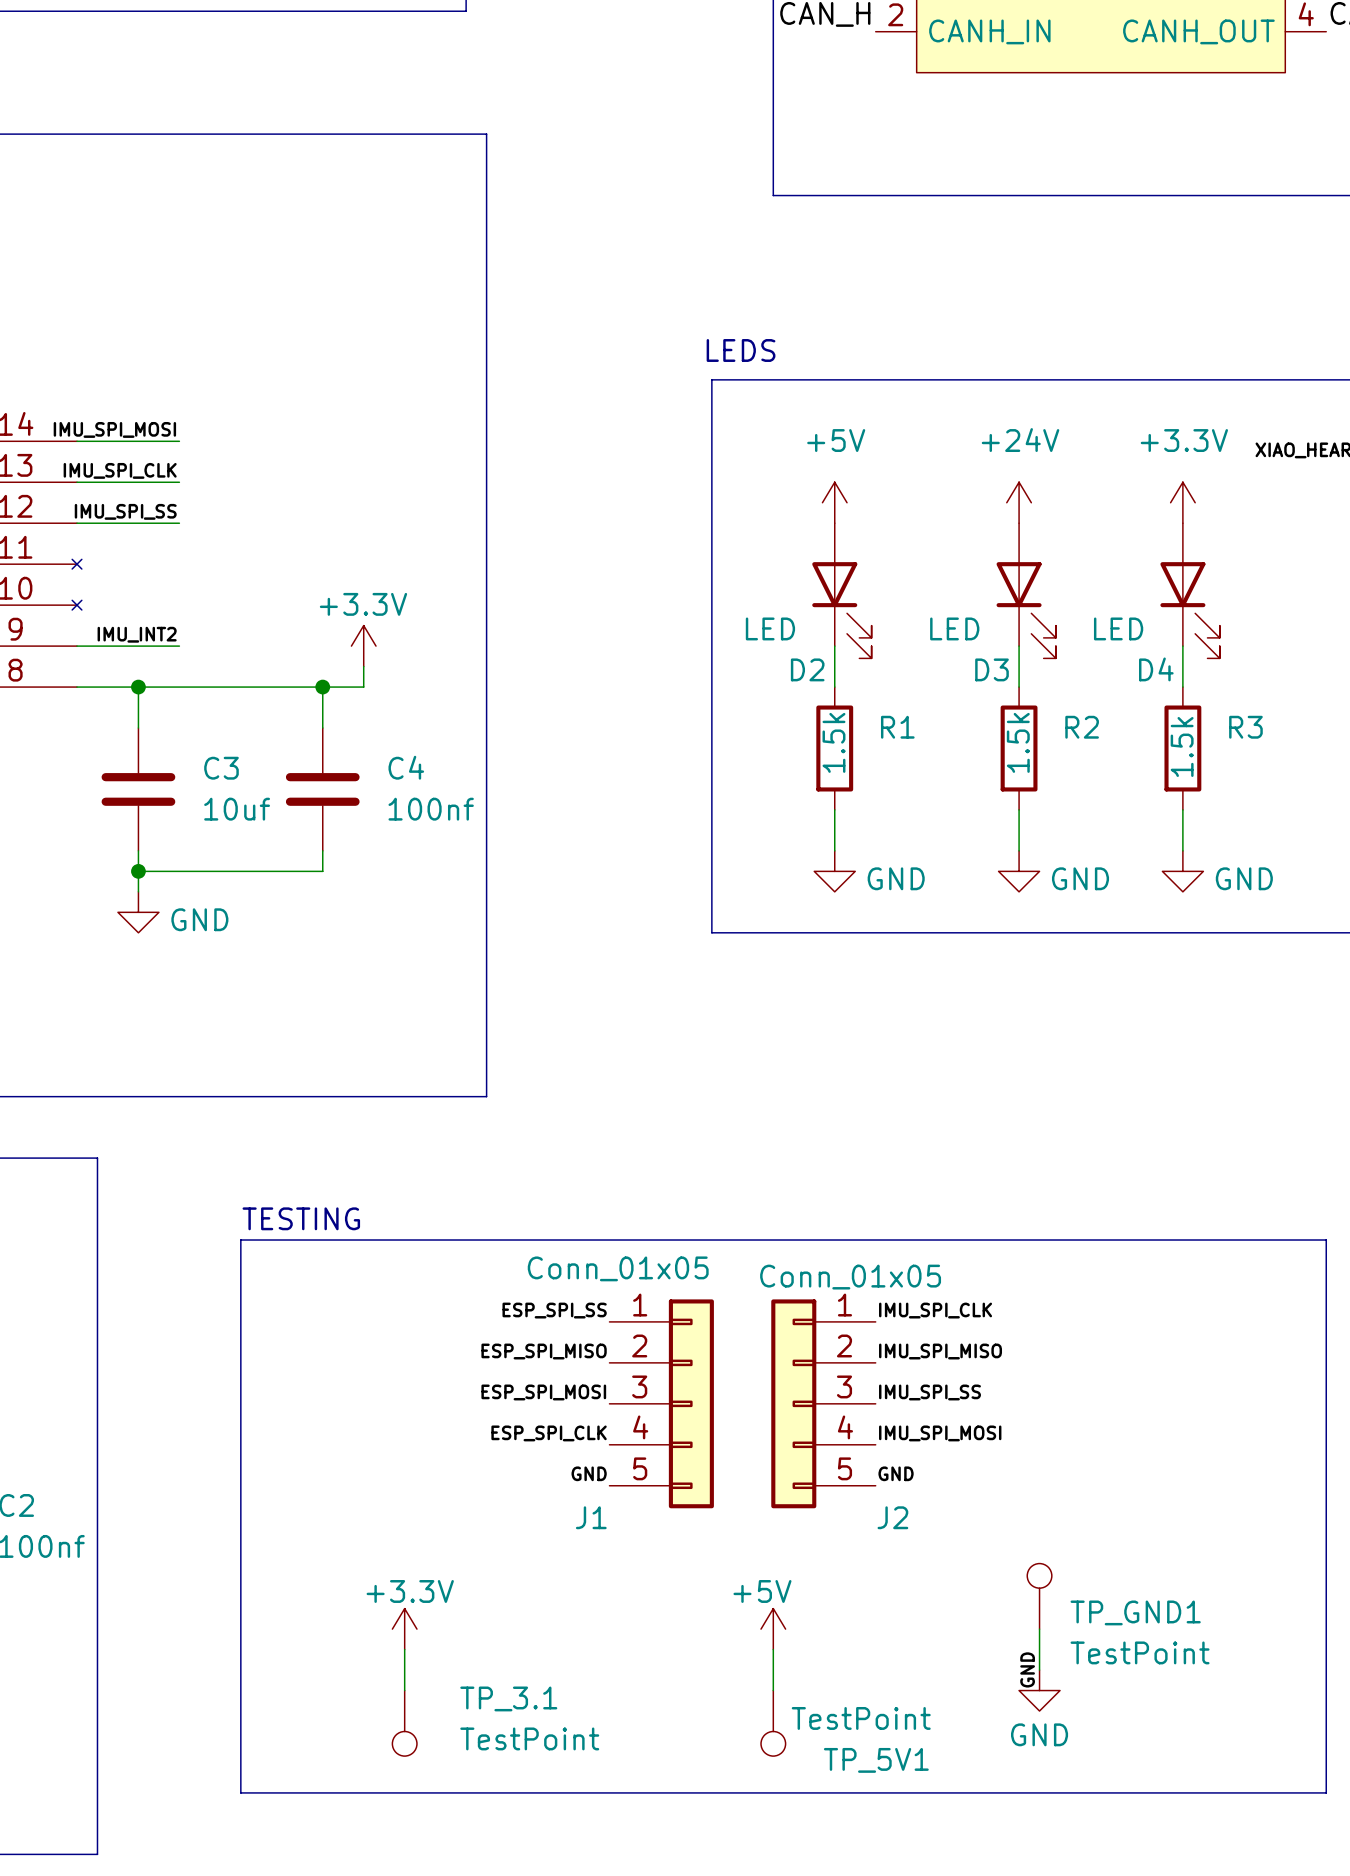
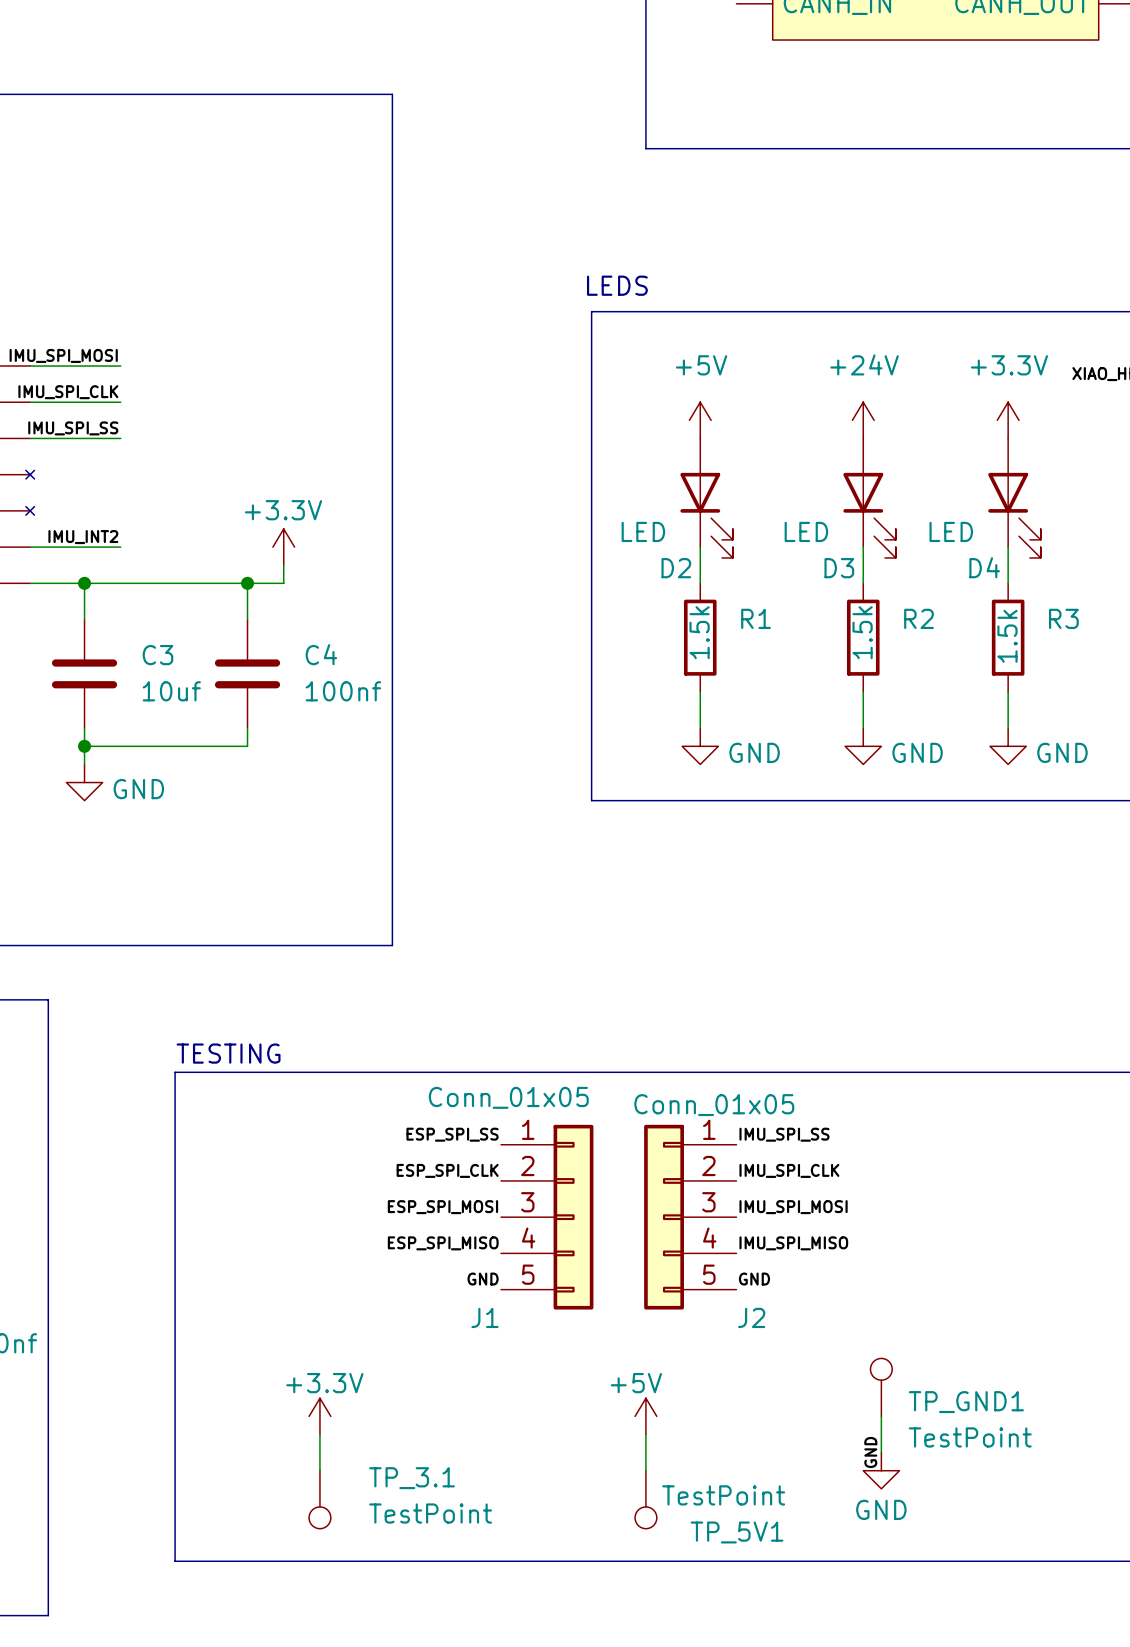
label: IMU_SPI_CLK (935, 1310) -> IMU_SPI_SS (784, 1134)
label: ESP_SPI_MISO (544, 1351) -> ESP_SPI_CLK (447, 1170)
label: IMU_SPI_MISO (940, 1351) -> IMU_SPI_CLK (789, 1170)
label: IMU_SPI_SS (929, 1392) -> IMU_SPI_MOSI (793, 1207)
label: ESP_SPI_CLK (549, 1433) -> ESP_SPI_MISO (443, 1243)
label: IMU_SPI_MOSI (940, 1433) -> IMU_SPI_MISO (793, 1243)

